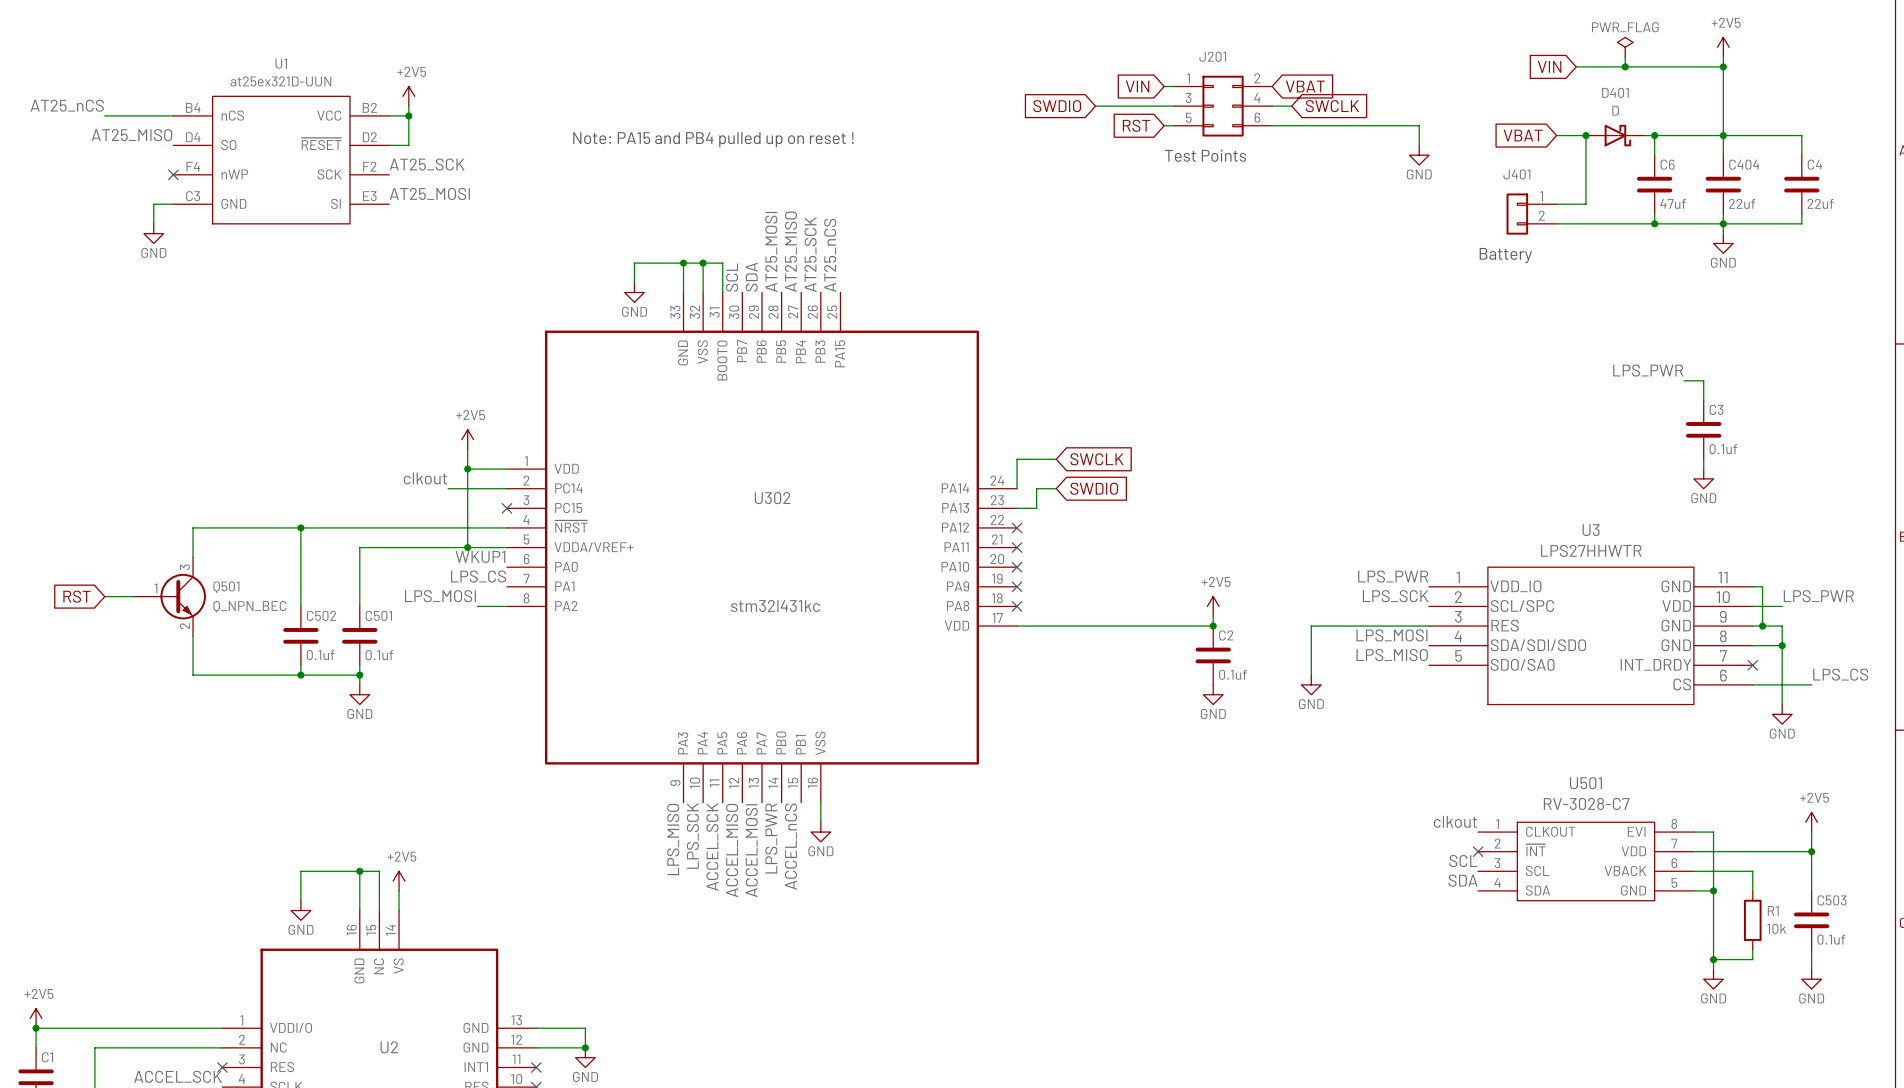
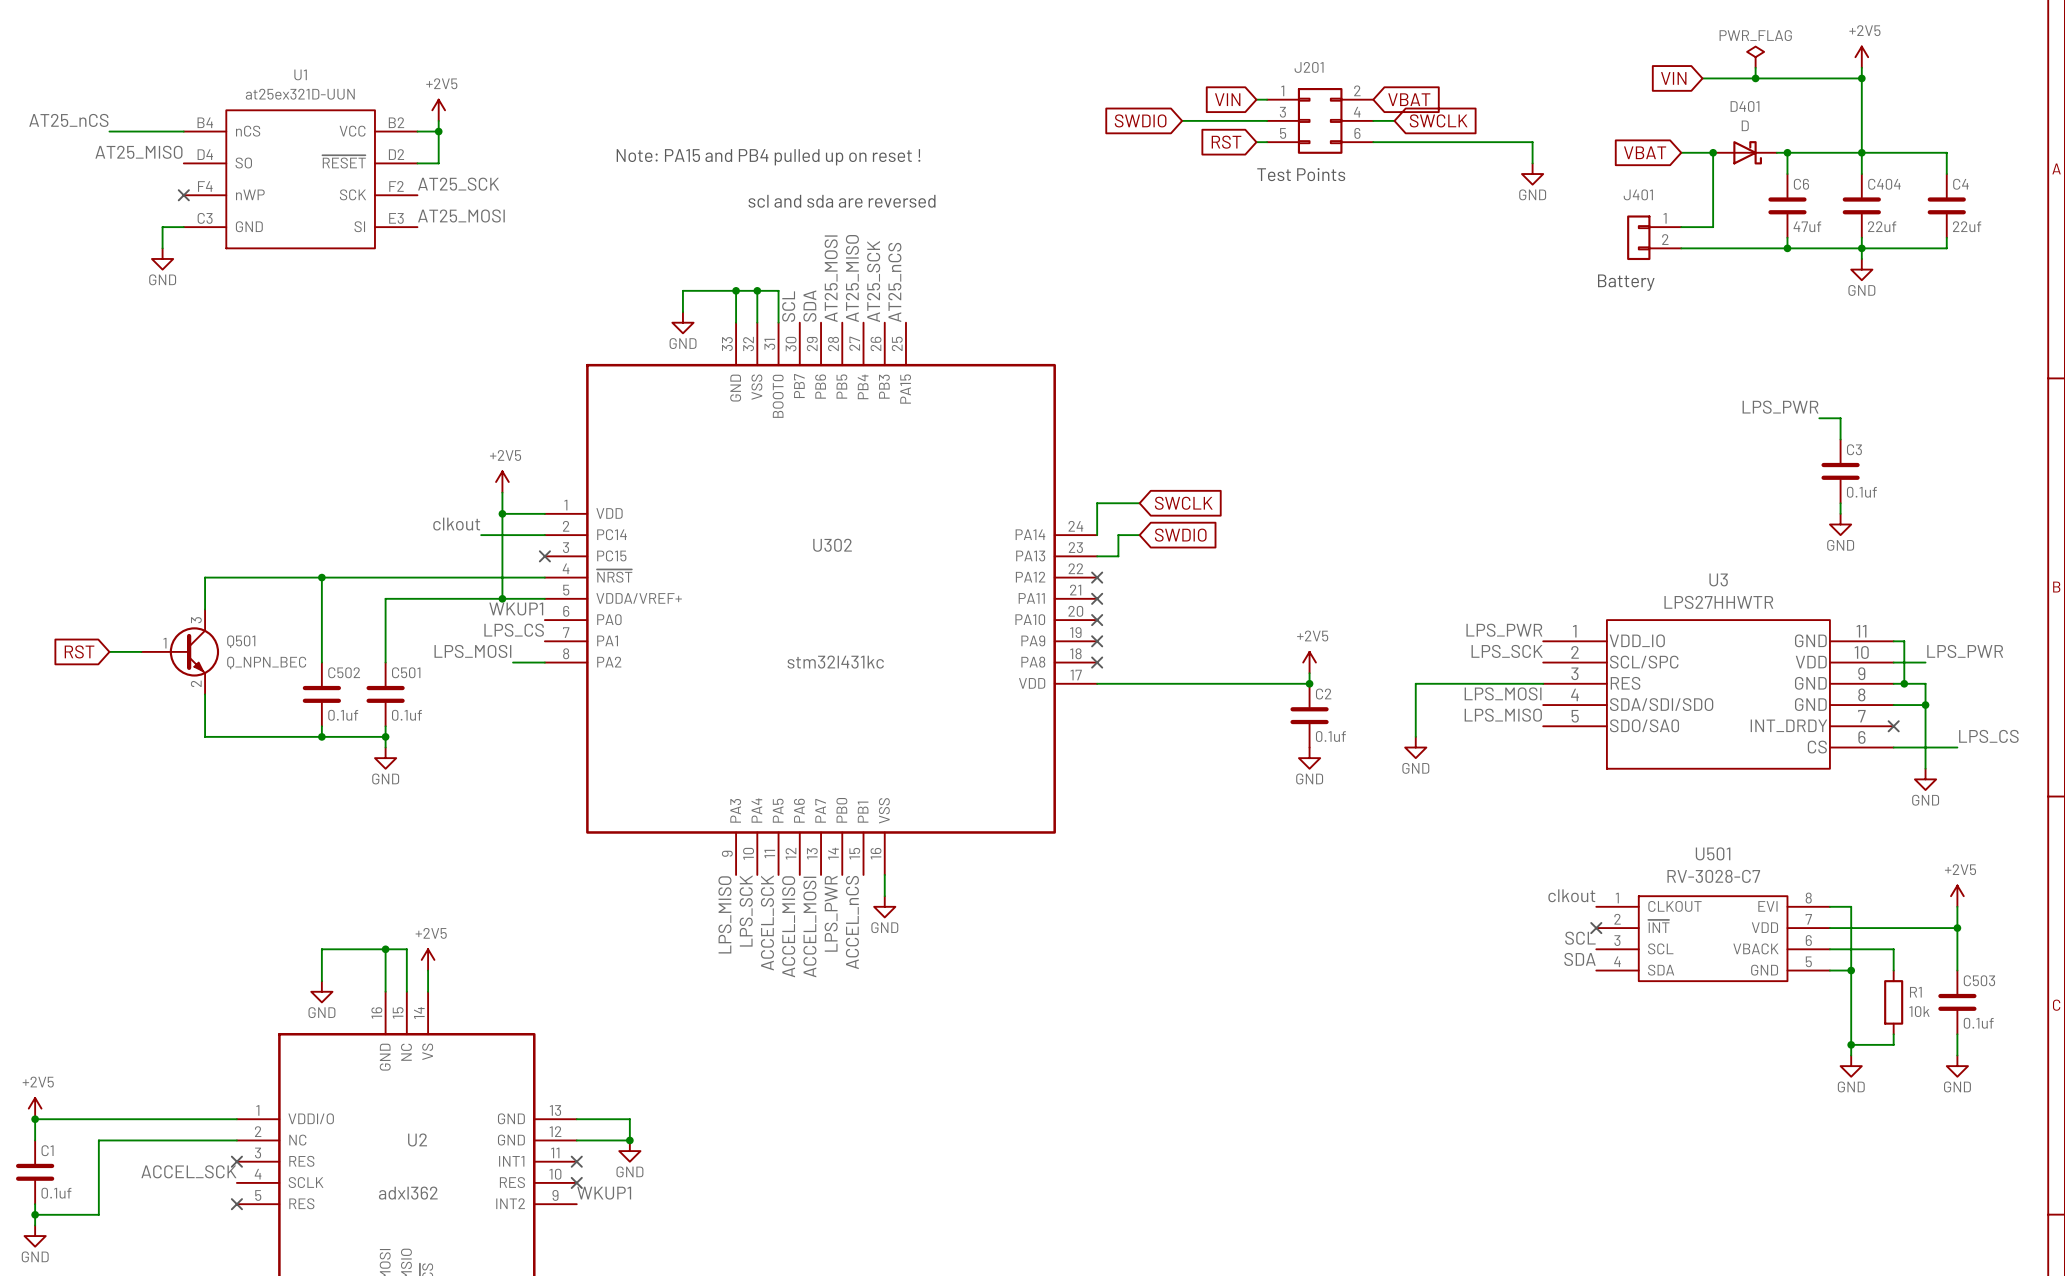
text: none -> scl and sda are reversed (842, 201)

